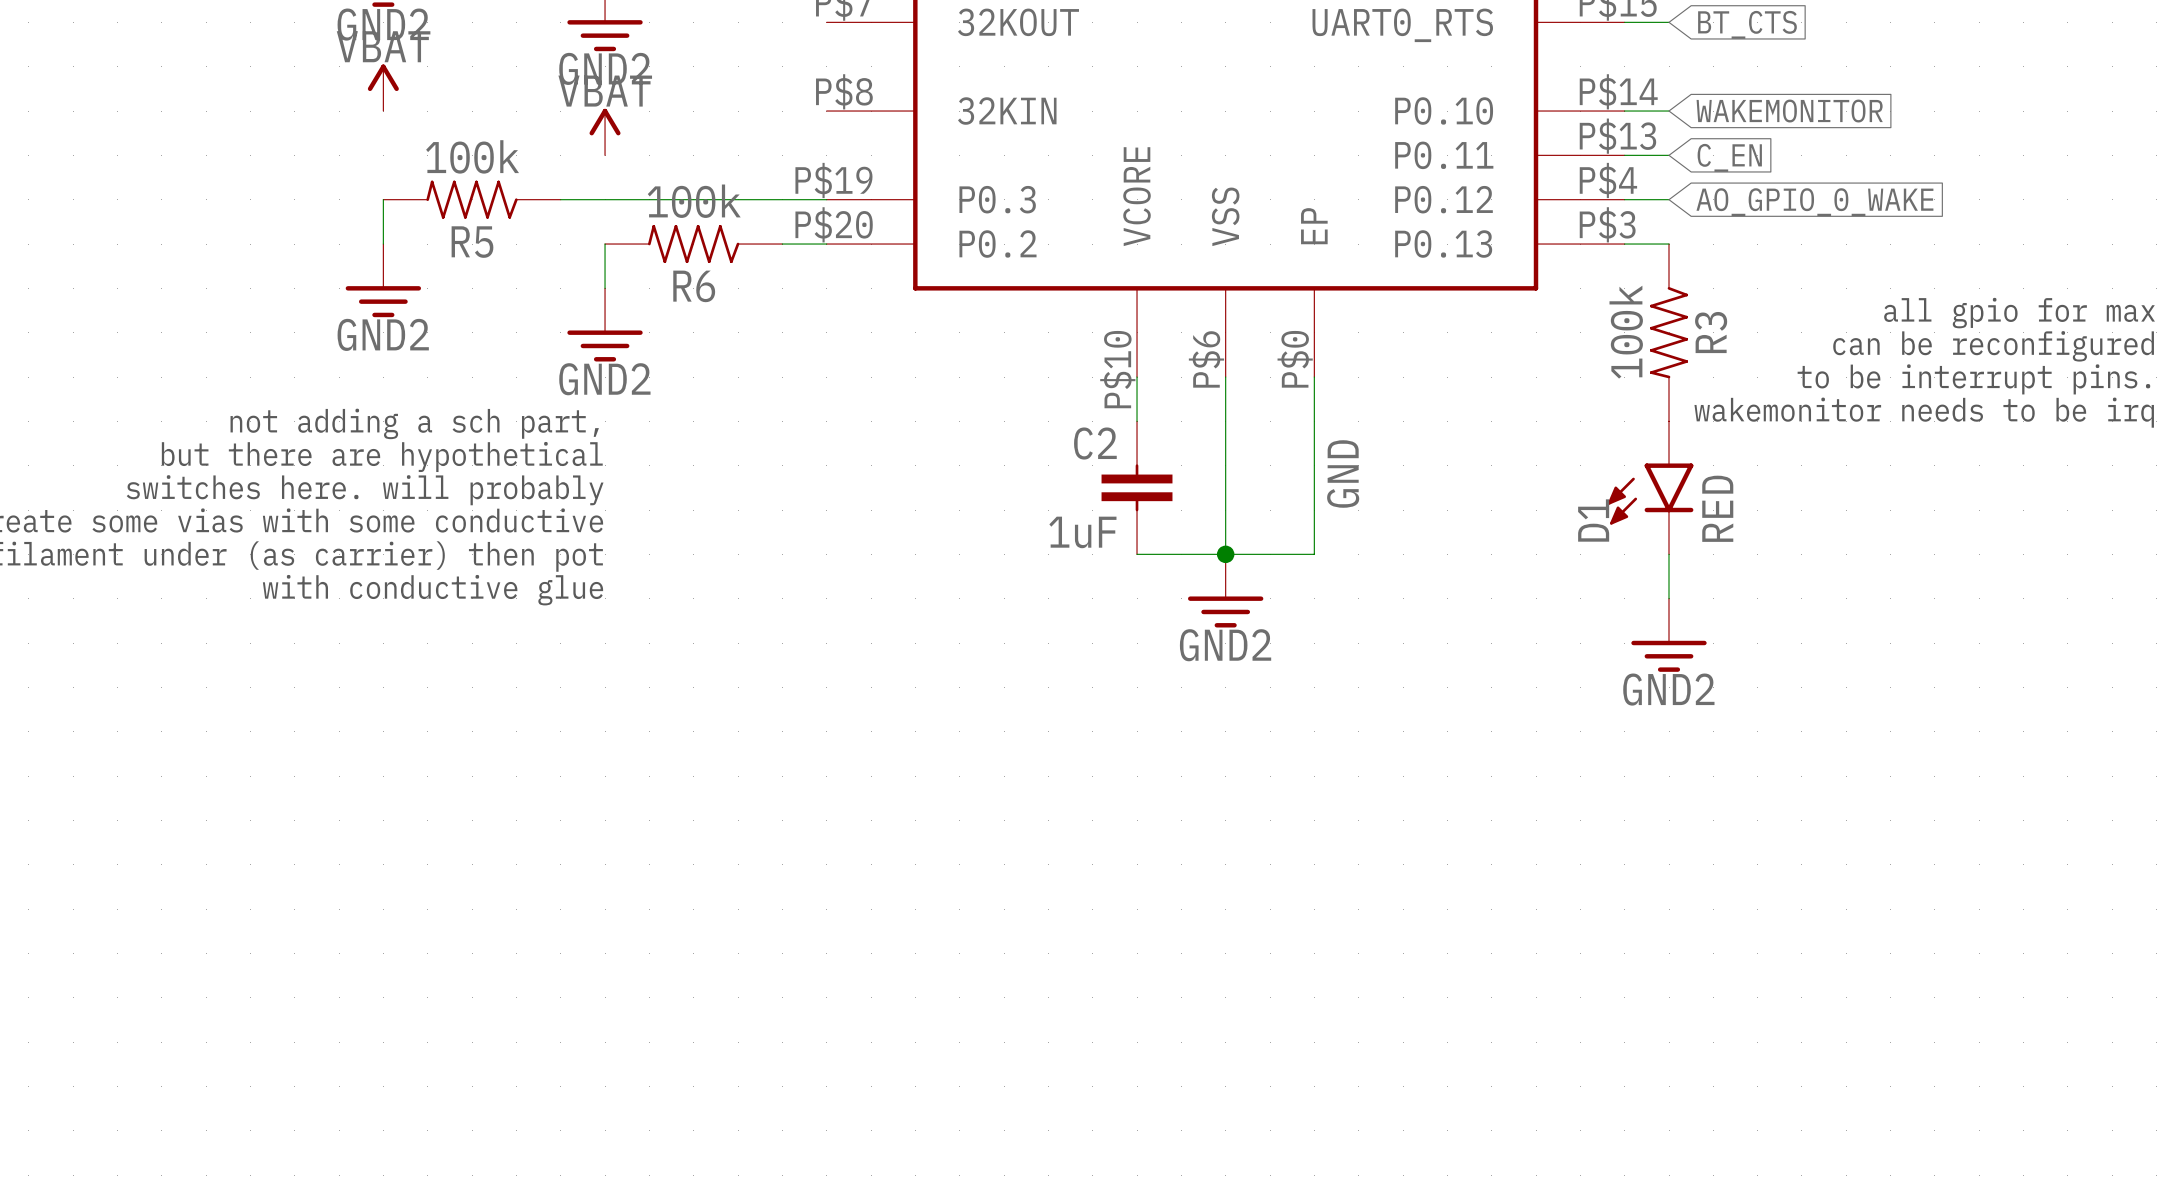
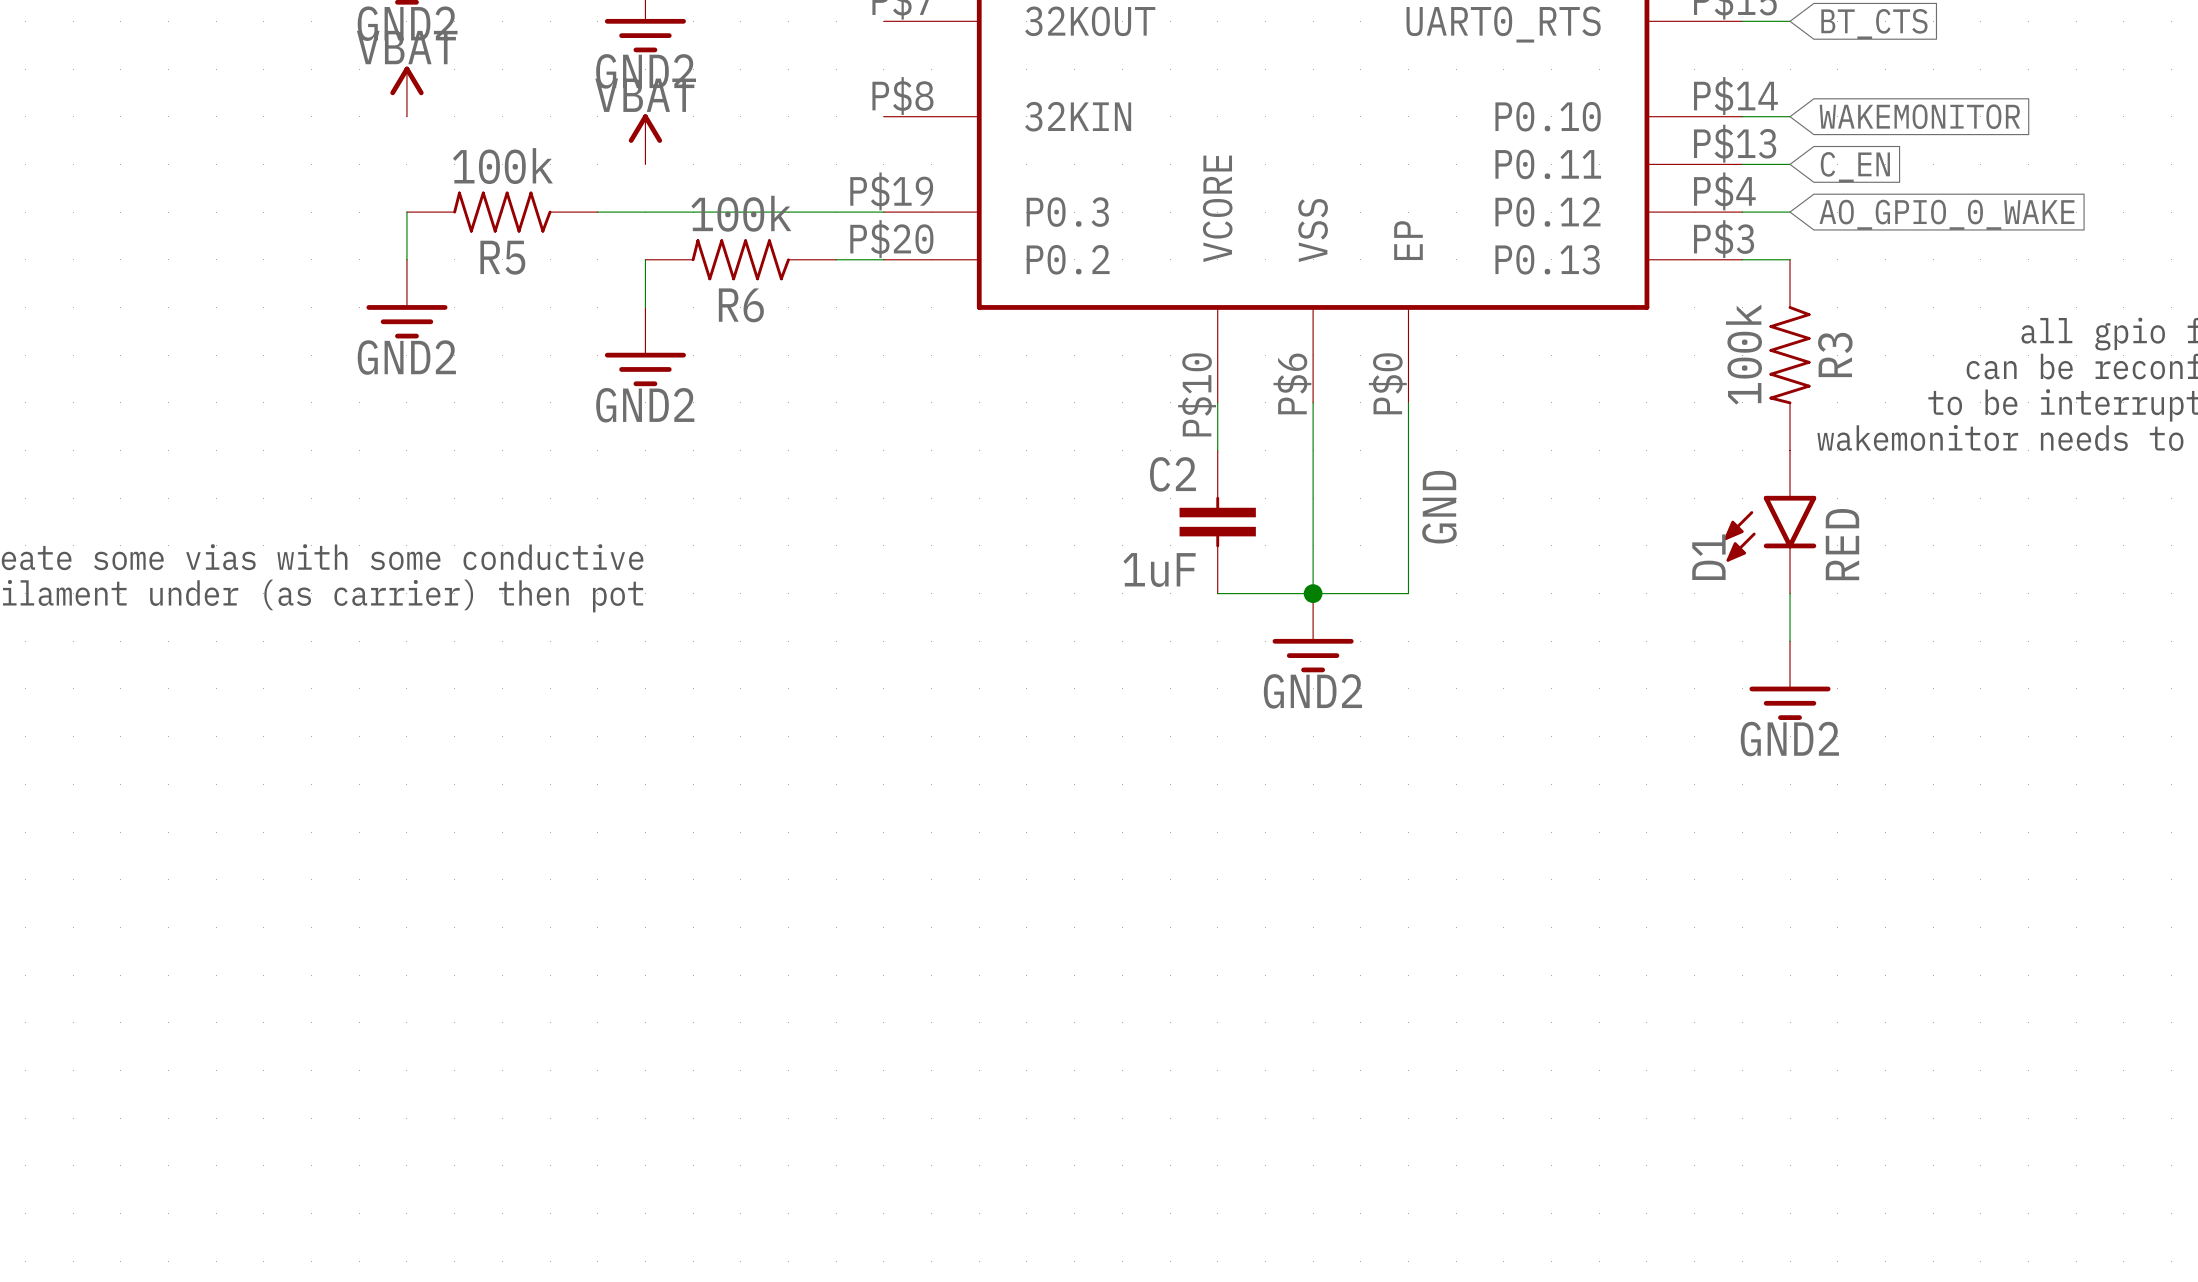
text: not adding a sch part, (414, 423) -> none
text: but there are hypothetical (382, 456) -> none
text: switches here. will probably (365, 490) -> none
text: with conductive glue (432, 590) -> none

